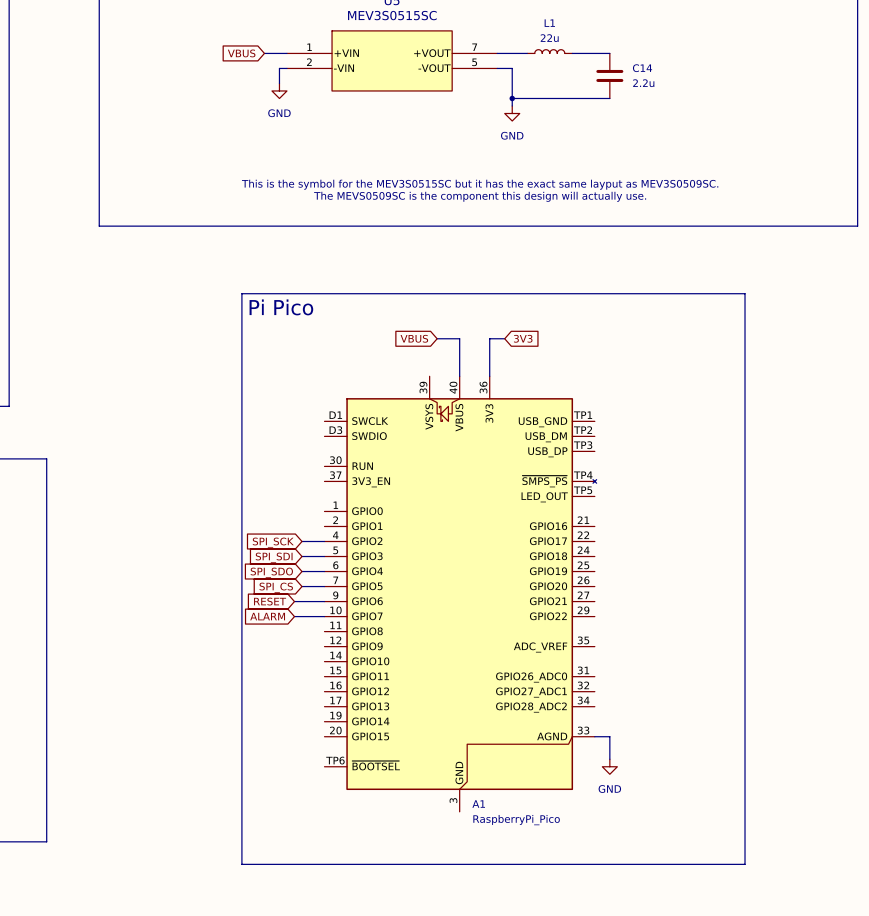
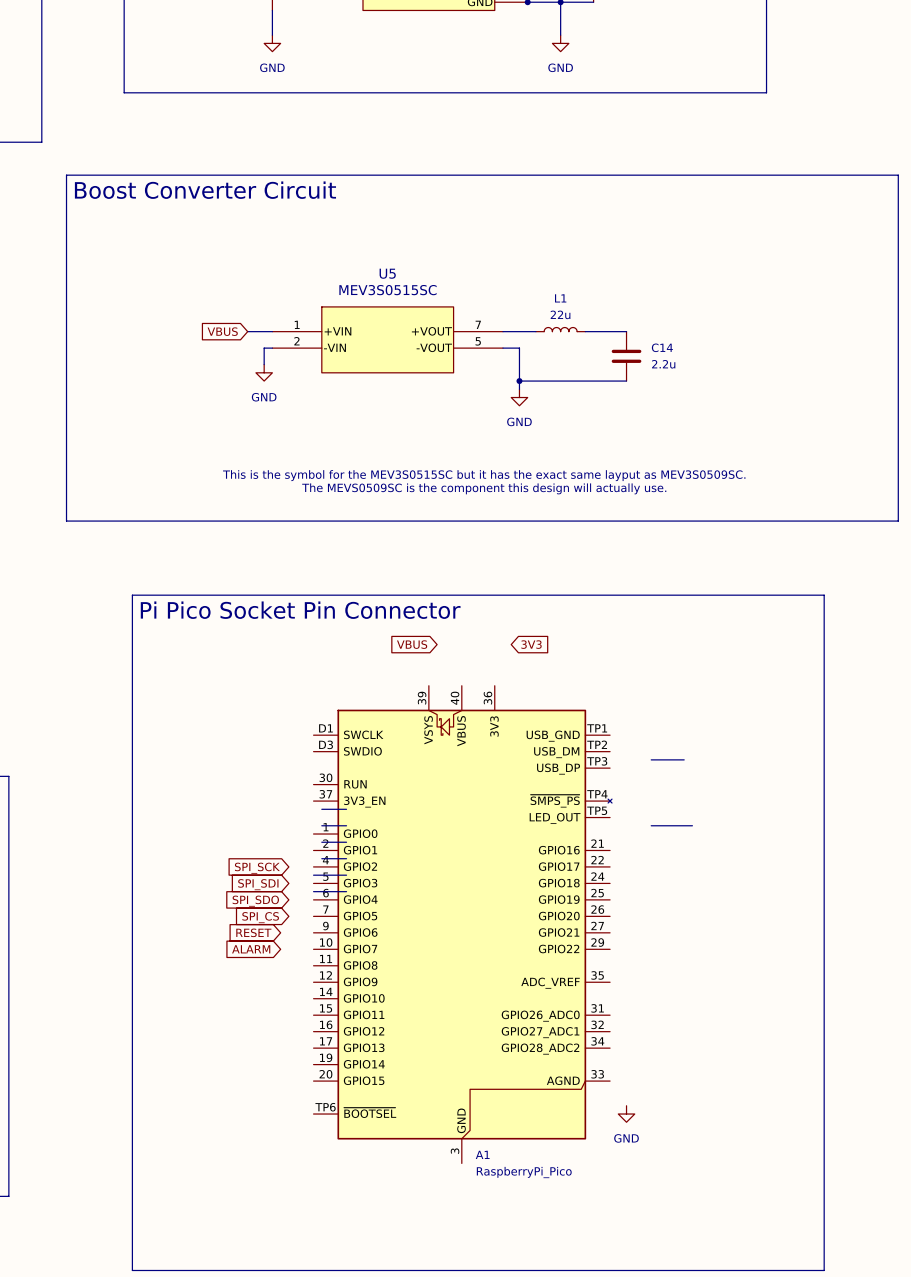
line: (241, 293) (241, 864) (745, 864) (745, 293) -> (222, 595) (132, 595) (132, 1270) (824, 1270) (824, 595) (774, 595)
text: Pi Pico (281, 307) -> none
text: none -> Pi Pico Socket Pin Connector (300, 610)
wire: (437, 338) (459, 338) (459, 376) -> none
wire: (504, 338) (489, 338) (489, 376) -> none
wire: none -> (651, 759) (684, 759)
wire: none -> (651, 825) (692, 825)
wire: (301, 541) (324, 541) -> (321, 809) (346, 809)
wire: (301, 556) (324, 556) -> (321, 825) (346, 825)
wire: (301, 571) (324, 571) -> (321, 842) (346, 842)
wire: (301, 586) (324, 586) -> (321, 858) (346, 858)
wire: (294, 601) (324, 601) -> (313, 875) (346, 875)
wire: (294, 616) (324, 616) -> (313, 891) (346, 891)
wire: (594, 736) (609, 736) (609, 759) -> none

